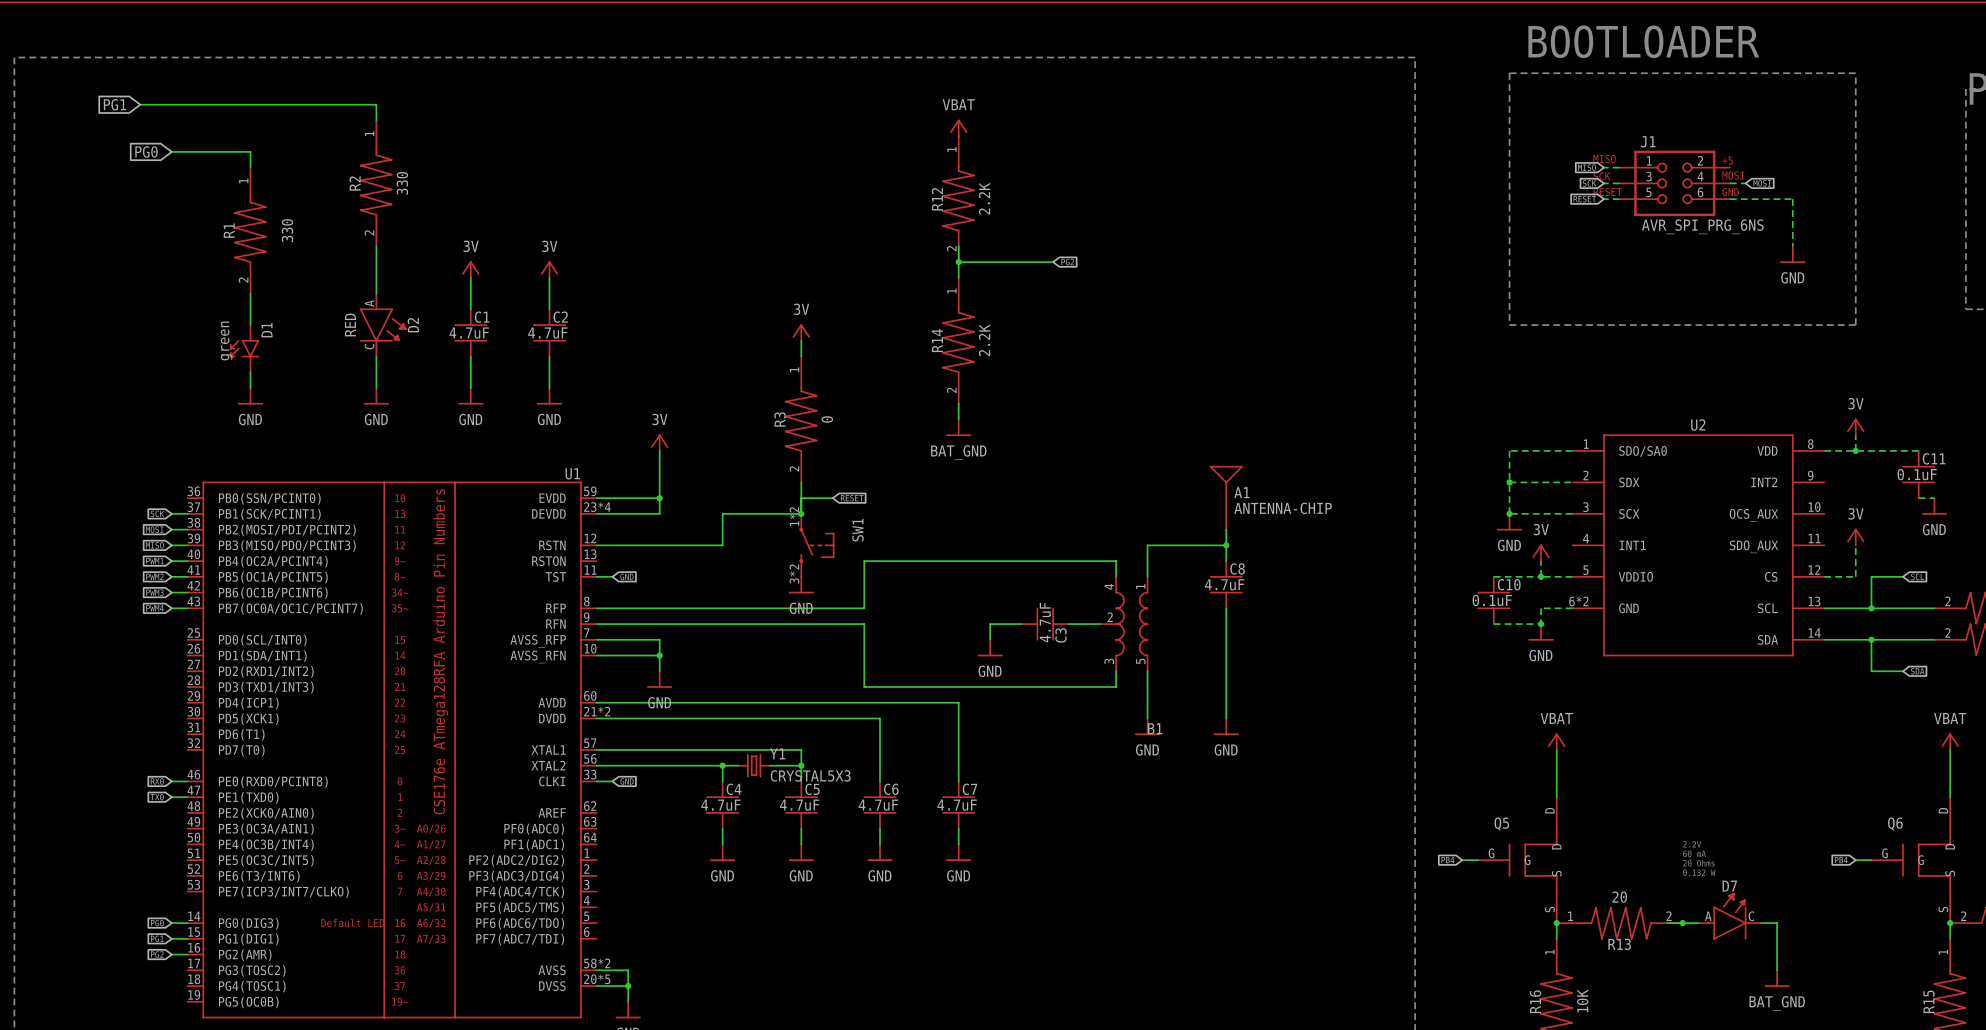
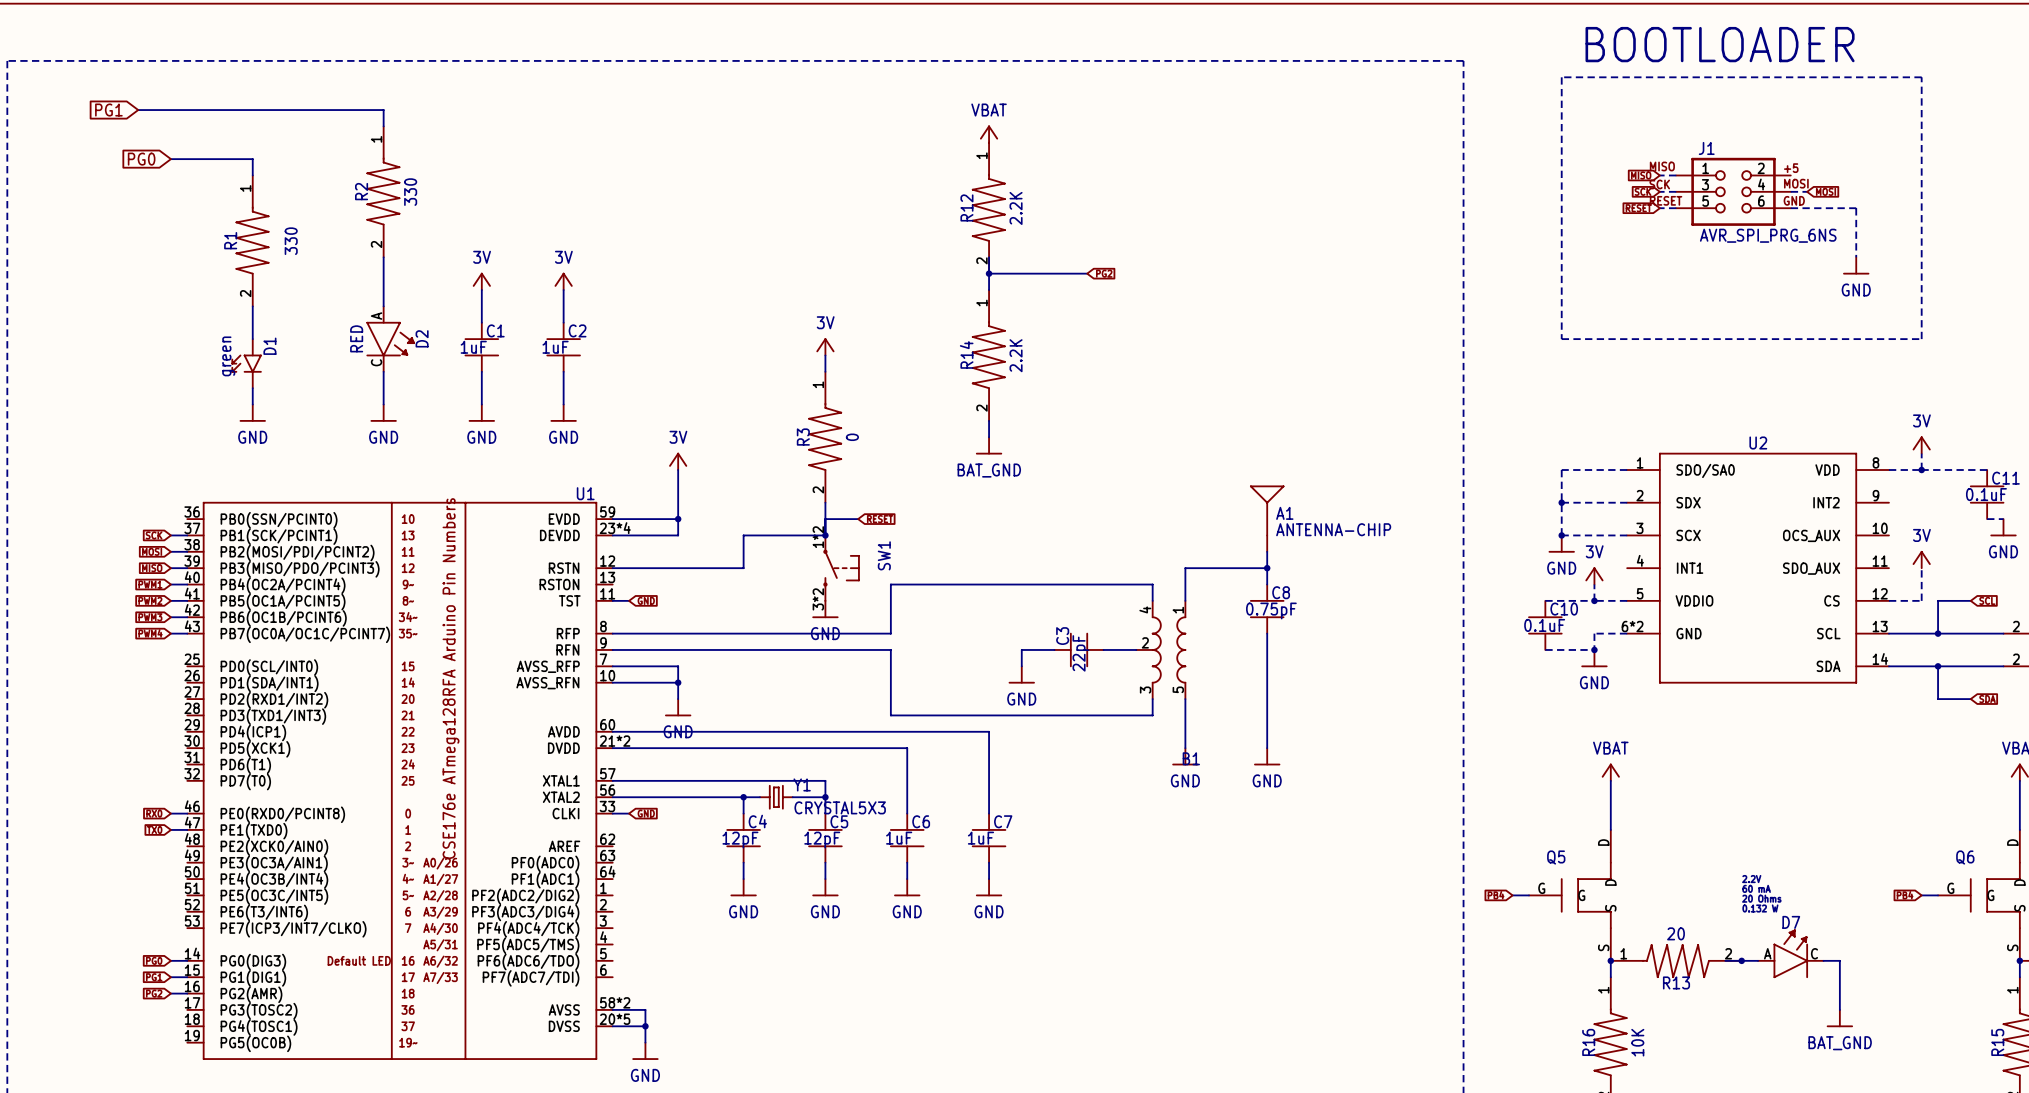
C1 value: 4.7uF (469, 333) -> 1uF (473, 347)
C2 value: 4.7uF (547, 333) -> 1uF (555, 347)
C8 value: 4.7uF (1224, 584) -> 0.75pF (1271, 610)
C3 value: 4.7uF (1045, 622) -> 22pF (1080, 653)
C3 name position: C3 (1061, 635) -> C3 (1062, 636)
C4 value: 4.7uF (721, 805) -> 12pF (740, 840)
C5 value: 4.7uF (799, 805) -> 12pF (822, 840)
C6 value: 4.7uF (878, 805) -> 1uF (899, 838)
C7 value: 4.7uF (957, 805) -> 1uF (980, 838)

